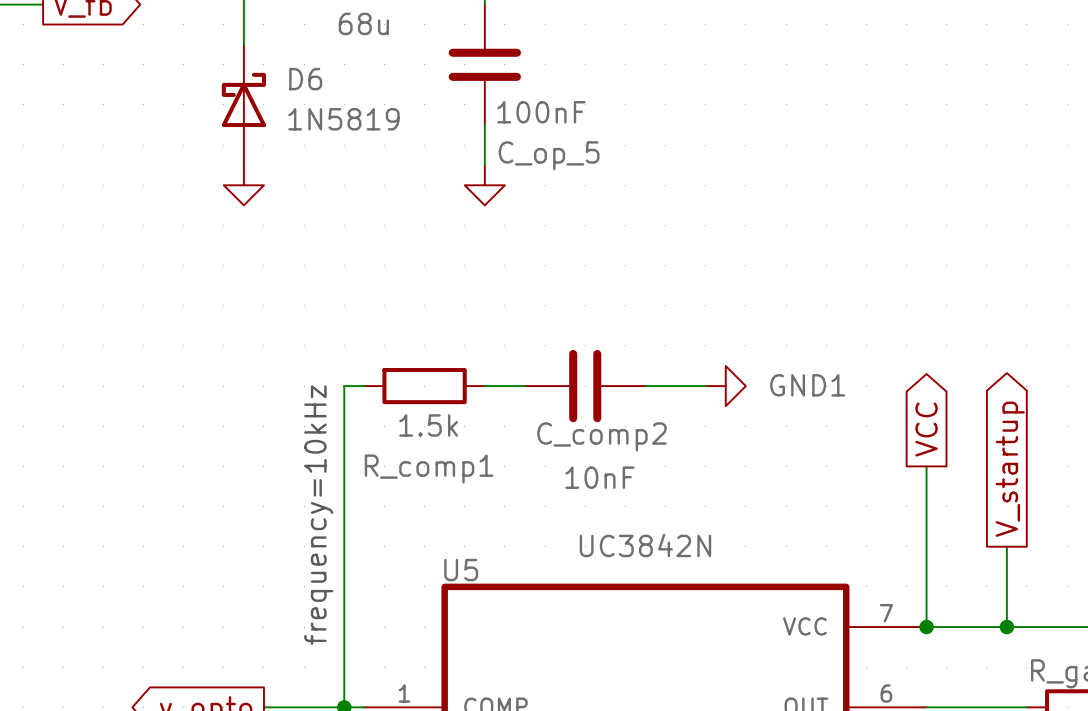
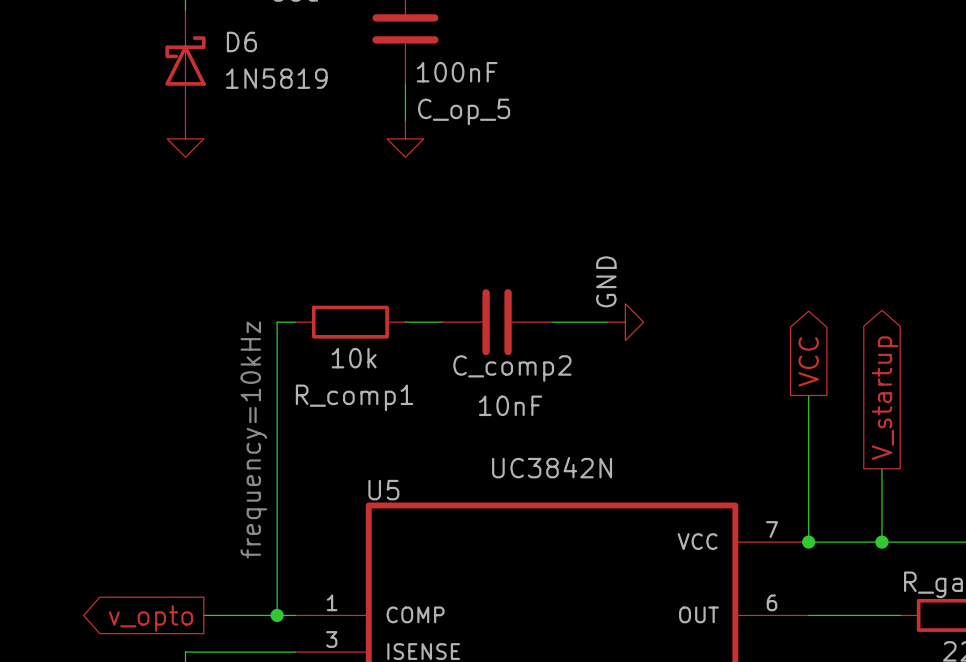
power symbol: GND1 (725, 386) -> GND (625, 322)
R_comp1 value: 1.5k (428, 425) -> 10k (354, 358)

